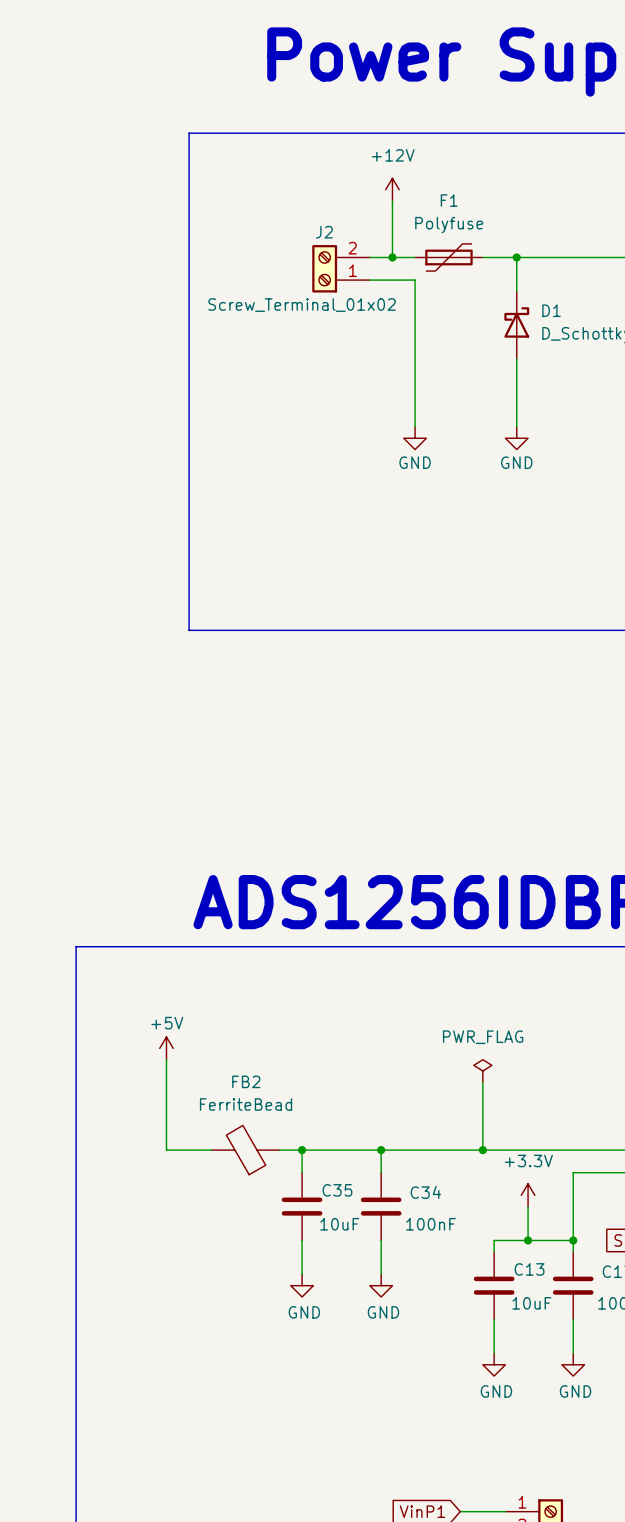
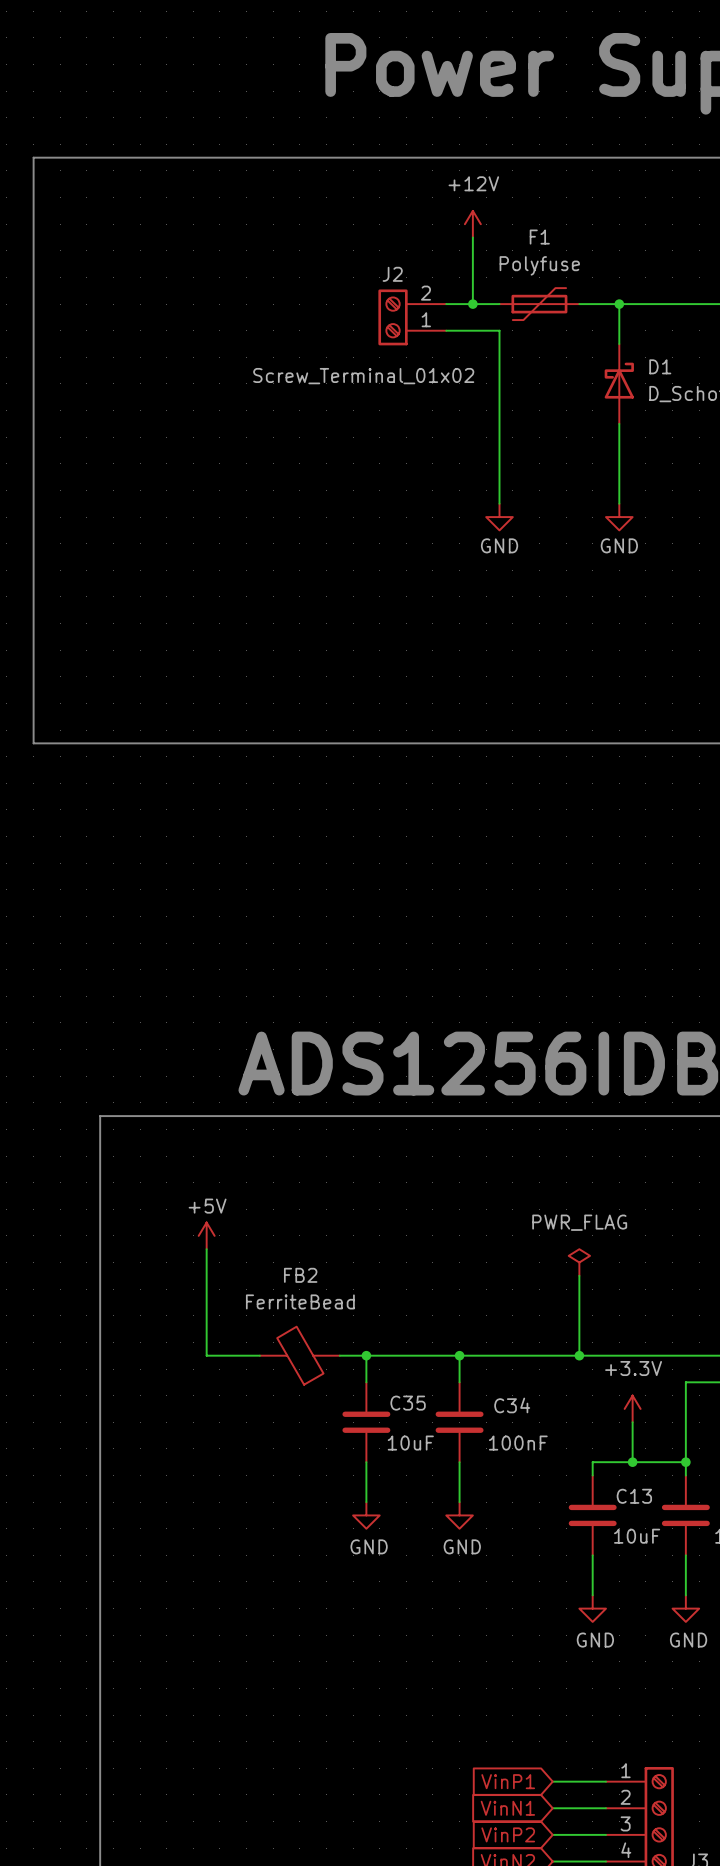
line: (189, 133) (189, 630) -> (233, 157) (33, 157) (33, 743) (233, 743)
J2 value position: Screw_Terminal_01x02 (302, 305) -> Screw_Terminal_01x02 (363, 376)

